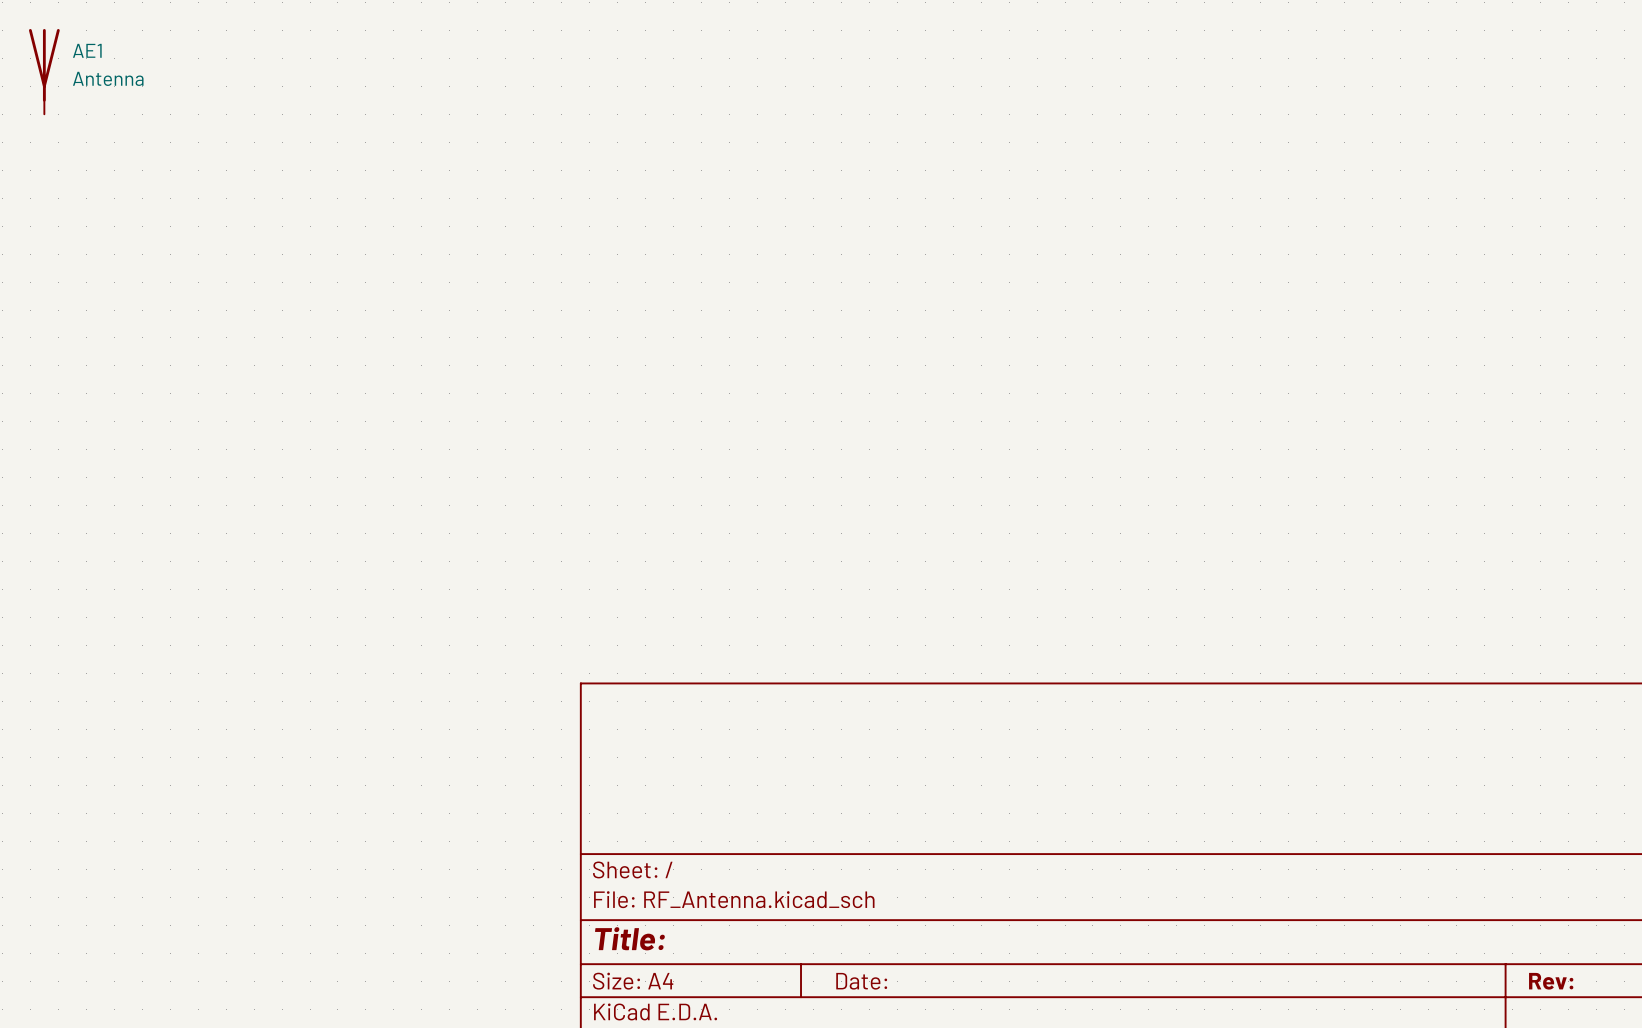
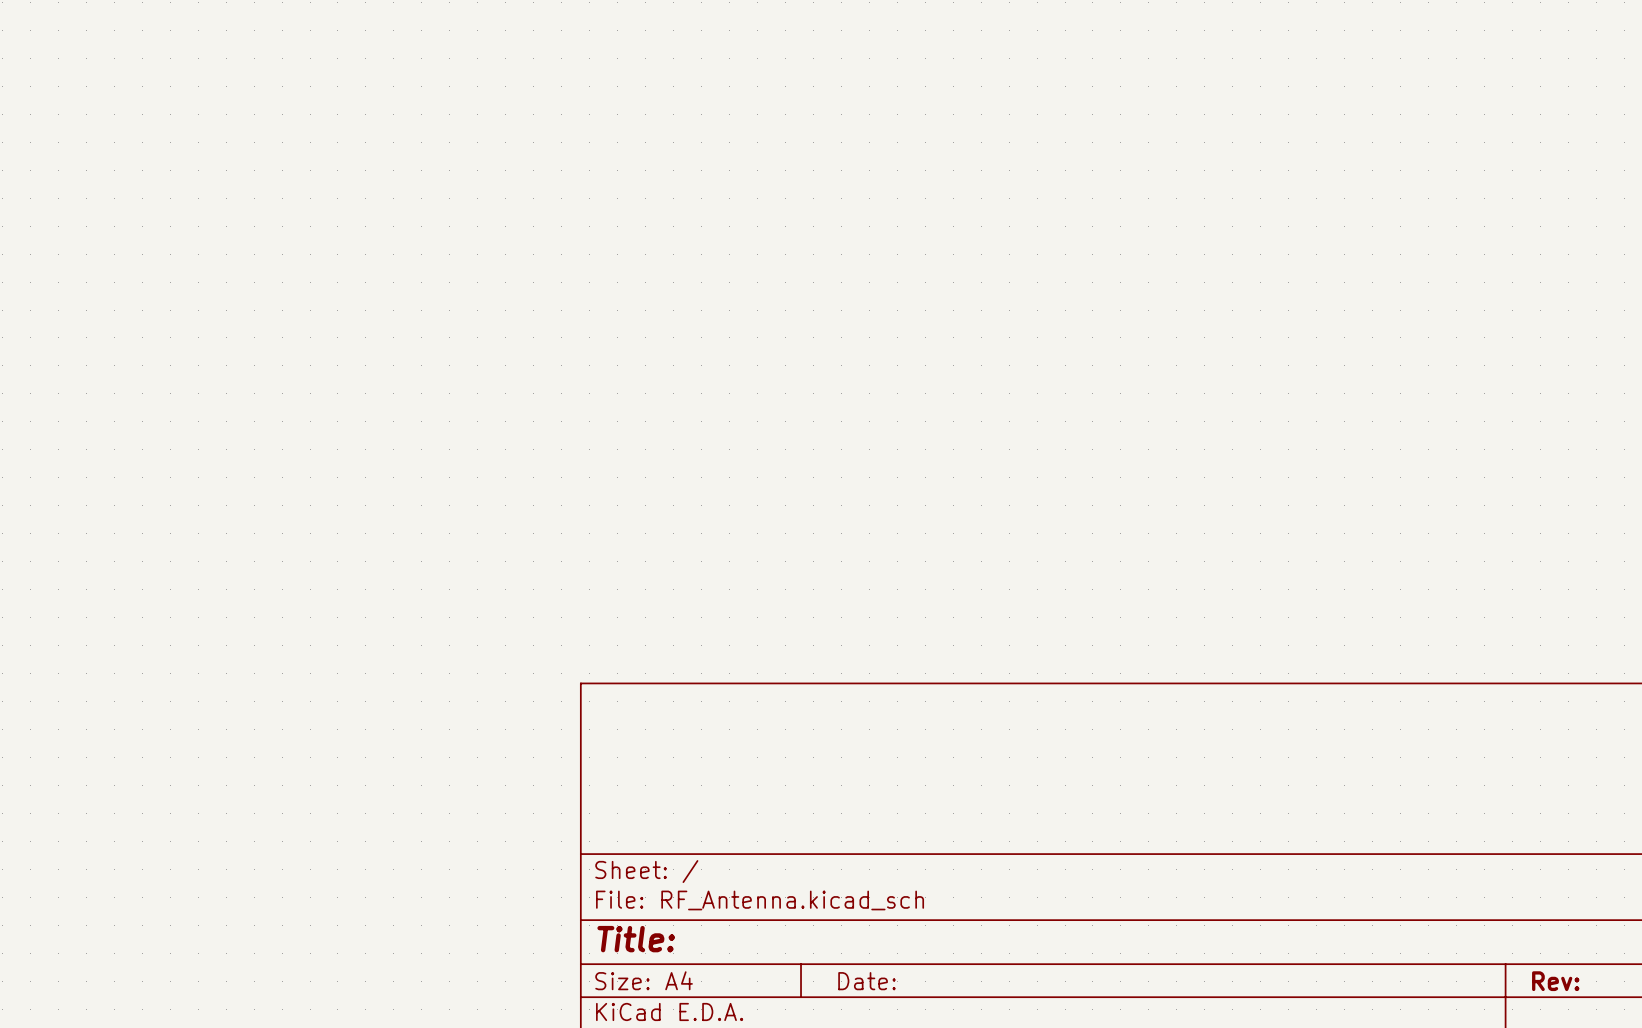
AE1: Antenna (44, 71) -> none

